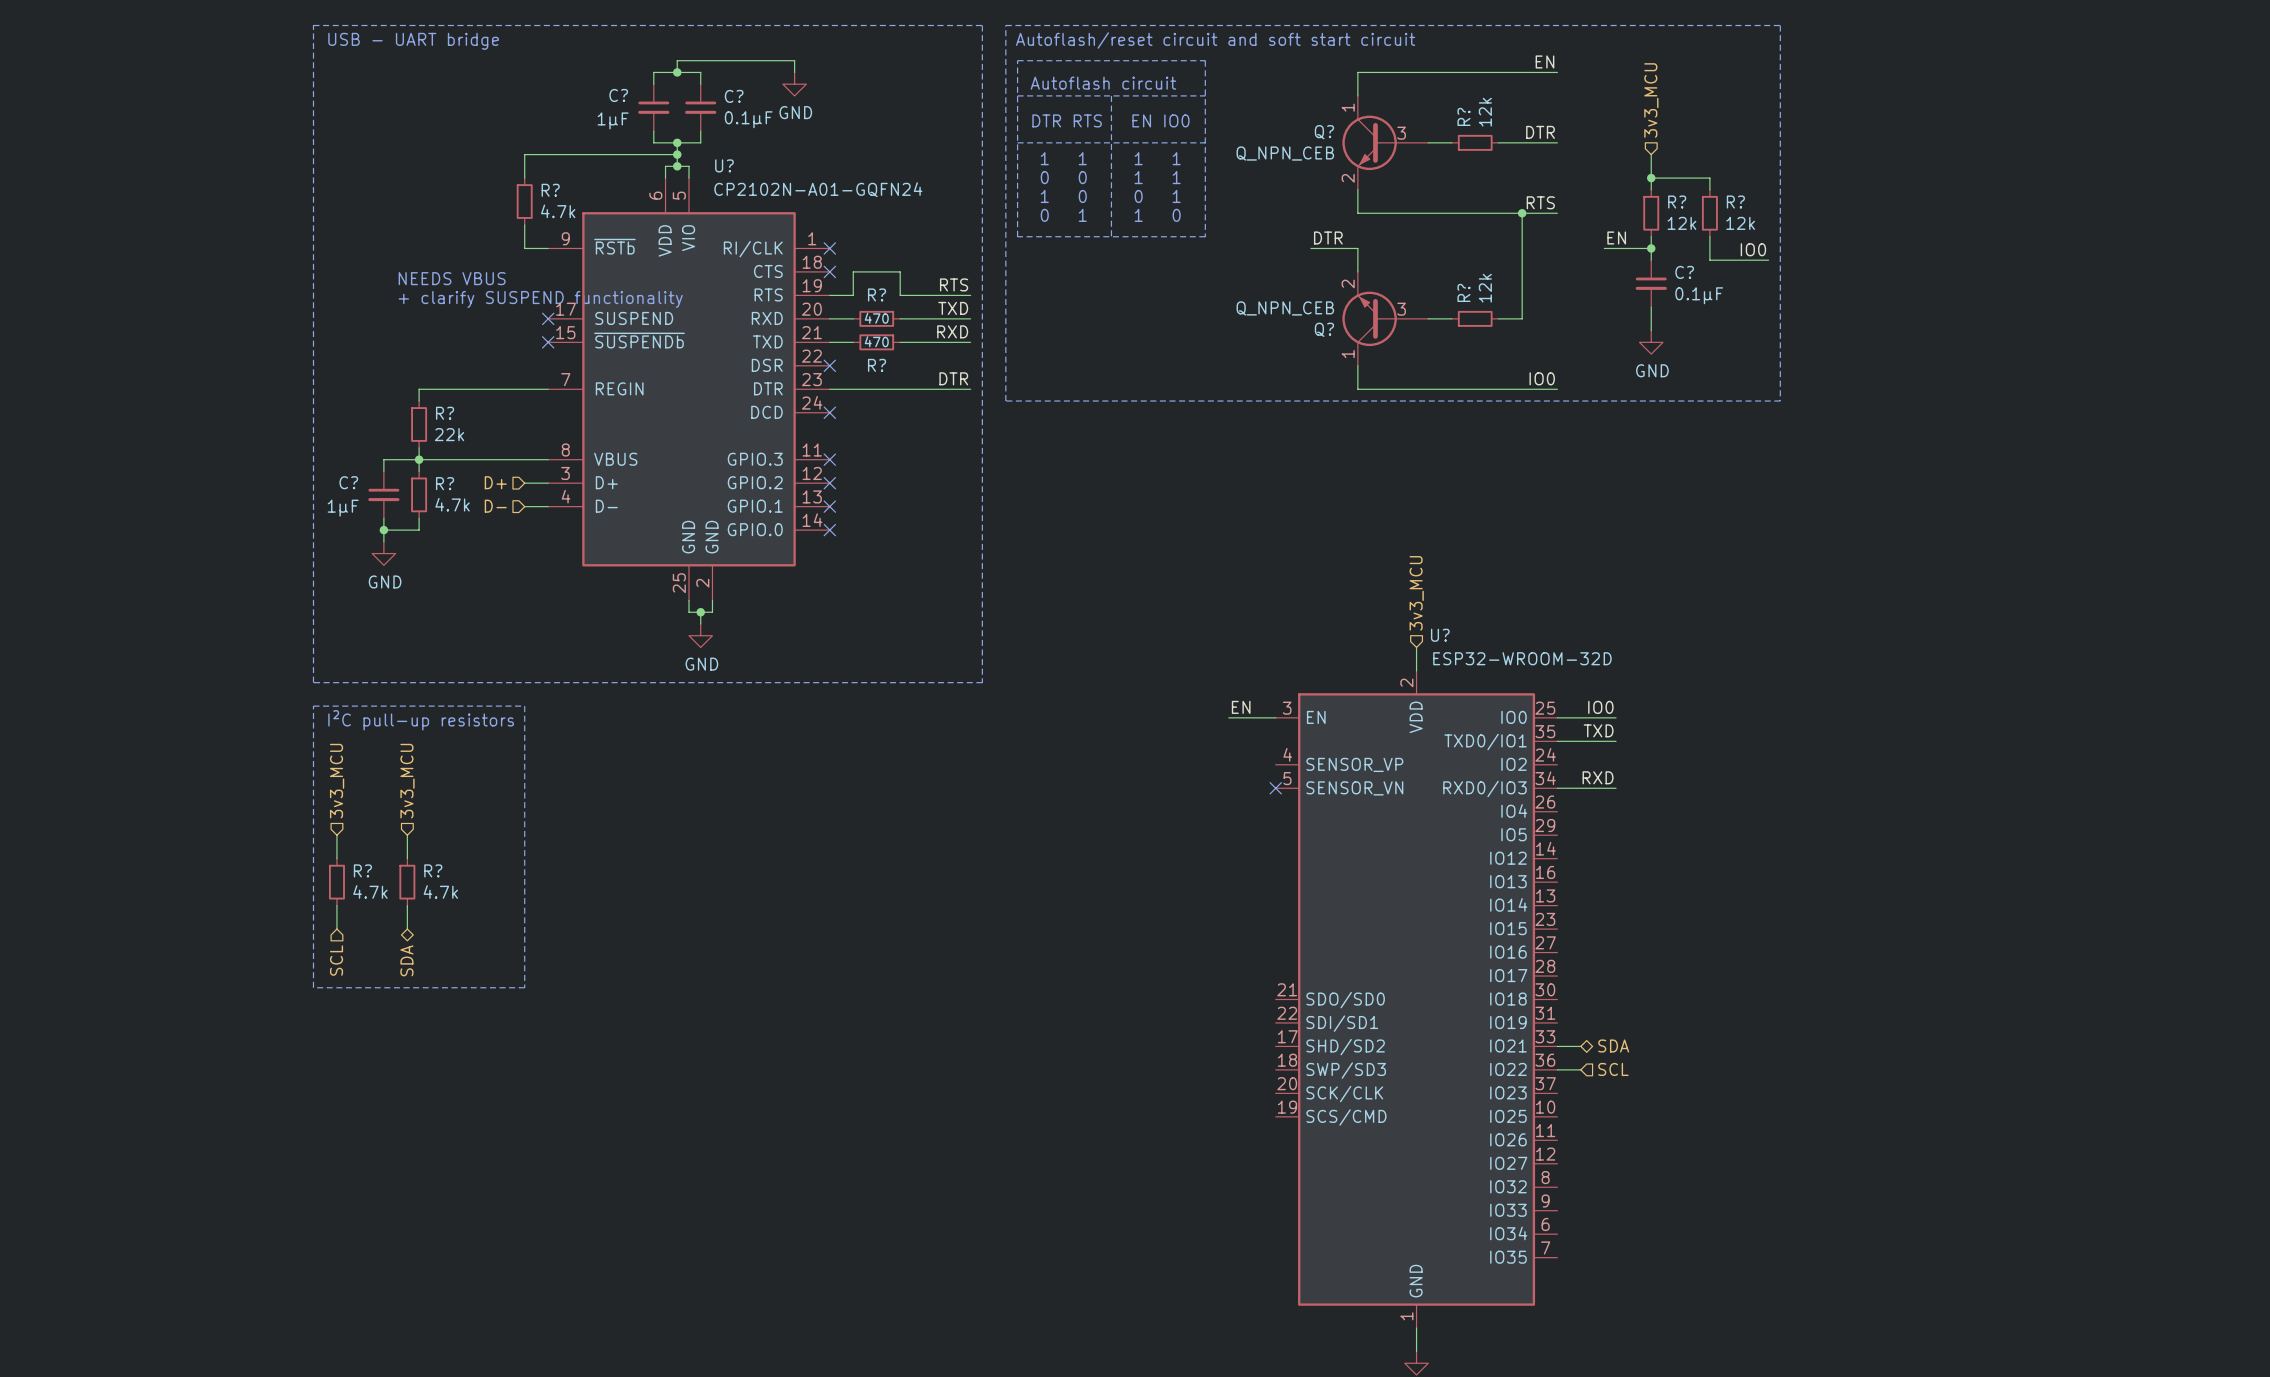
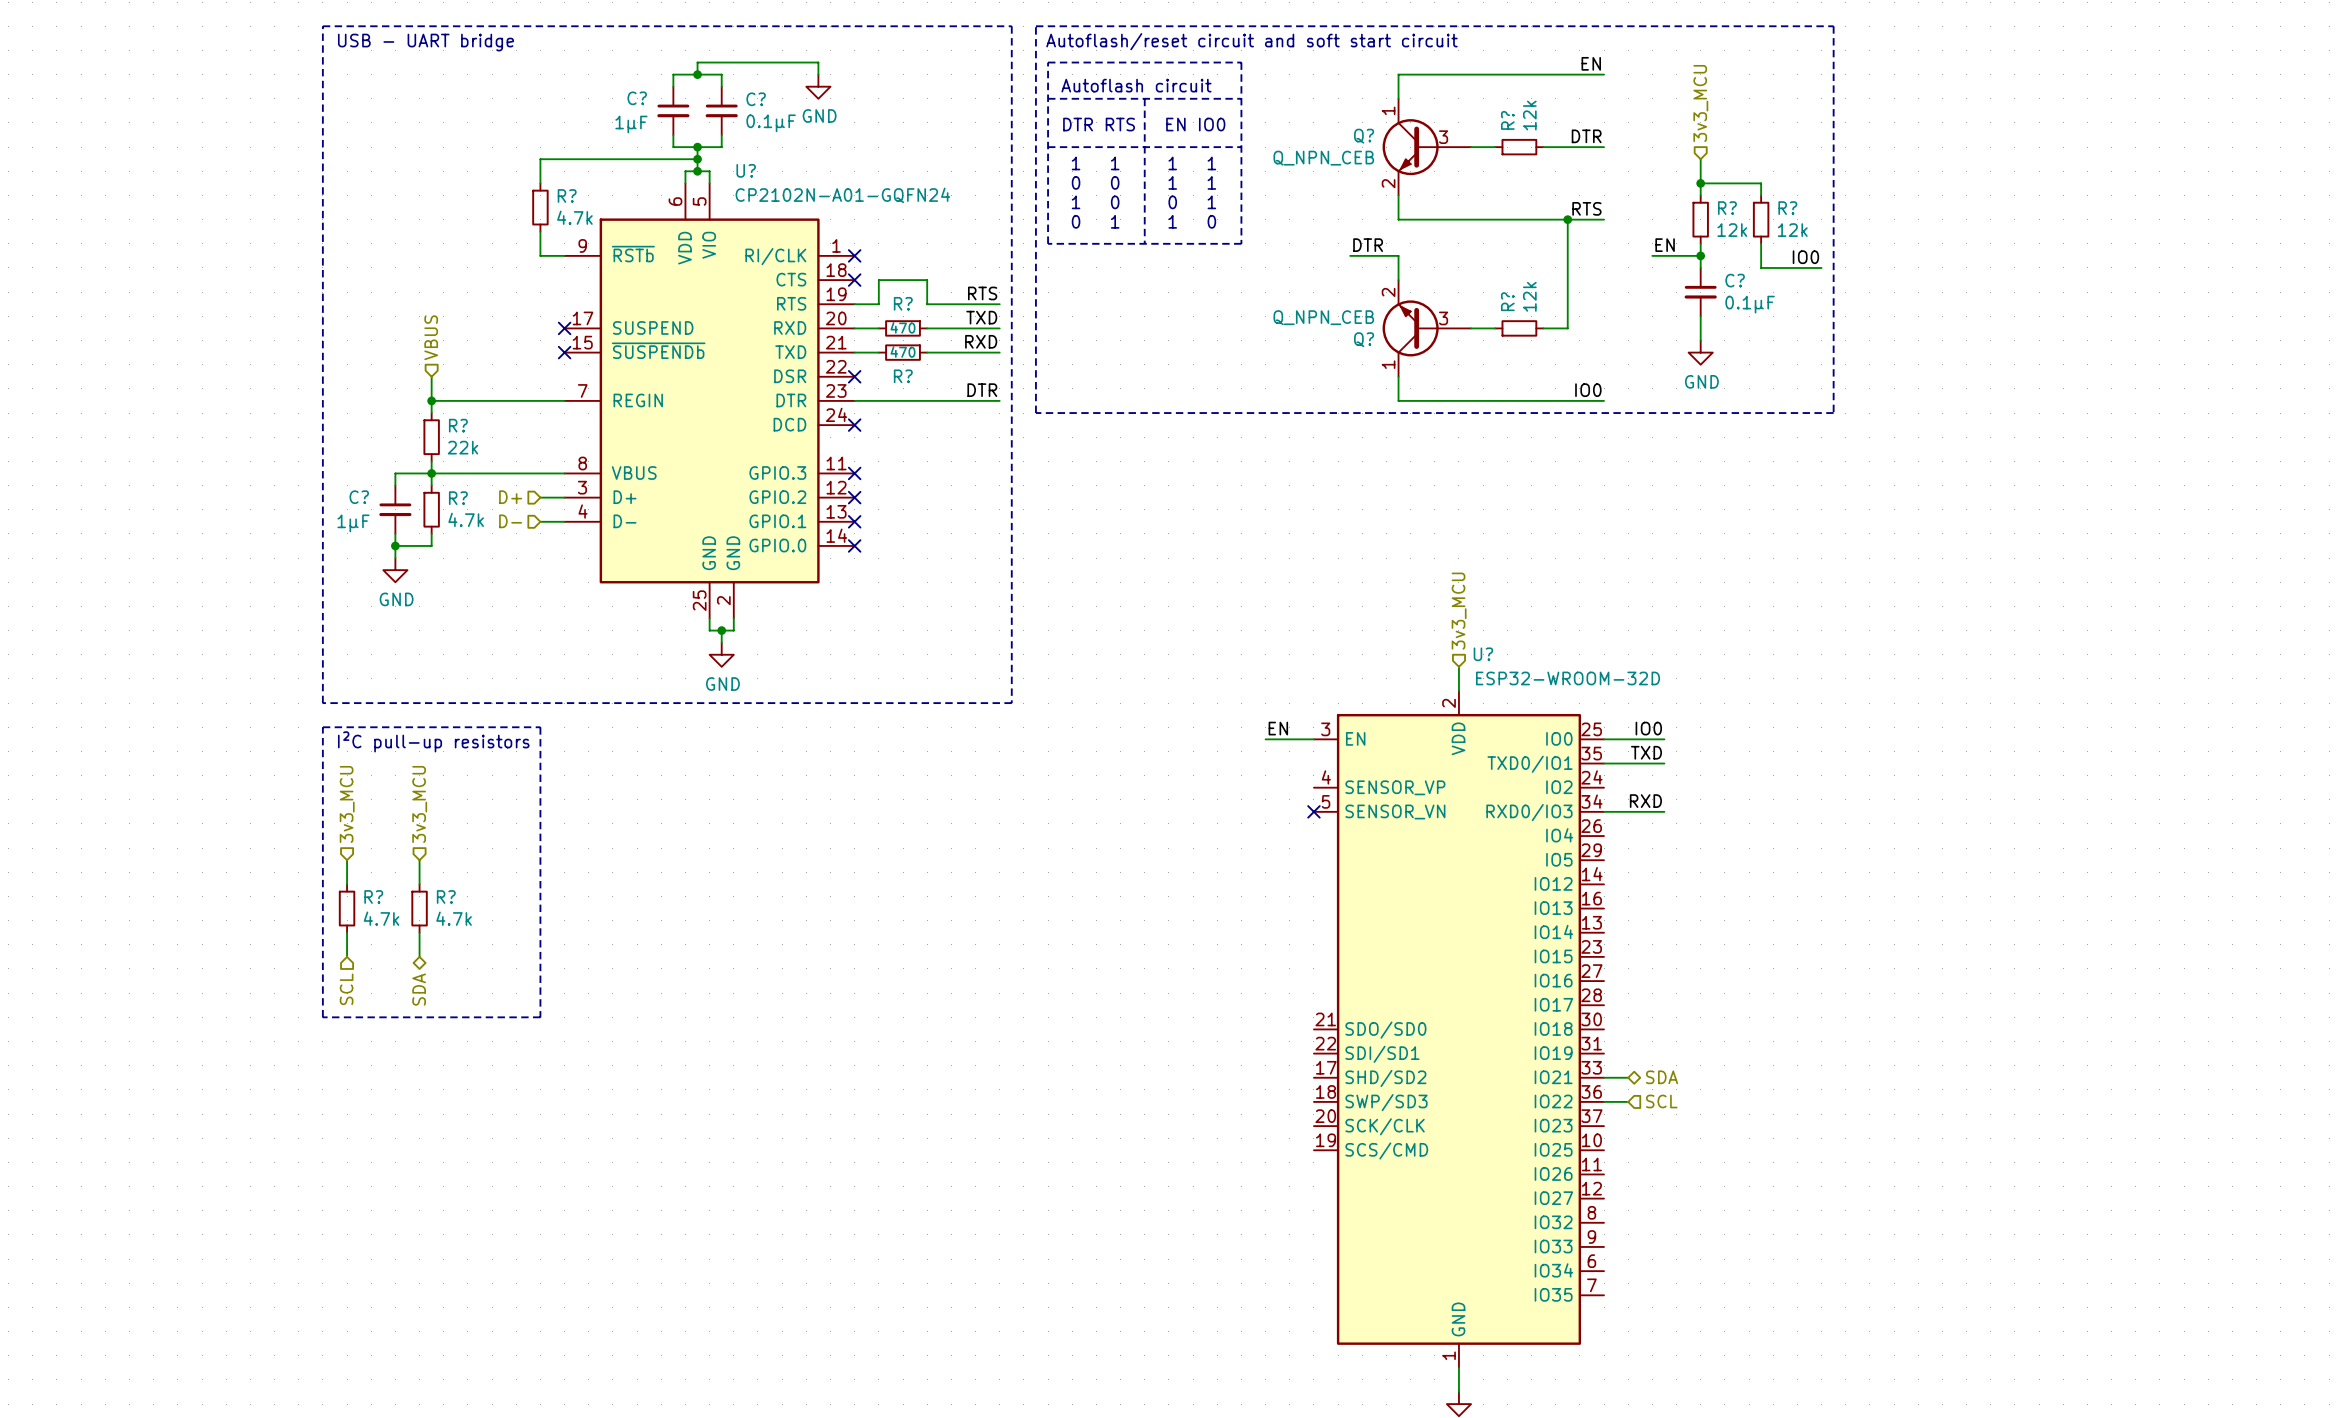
text: NEEDS VBUS (452, 278) -> none
text: + clarify SUSPEND functionality (540, 299) -> none
hierarchical label: none -> VBUS (431, 337)
wire: none -> (431, 376) (431, 400)
junction: none -> (431, 400)

